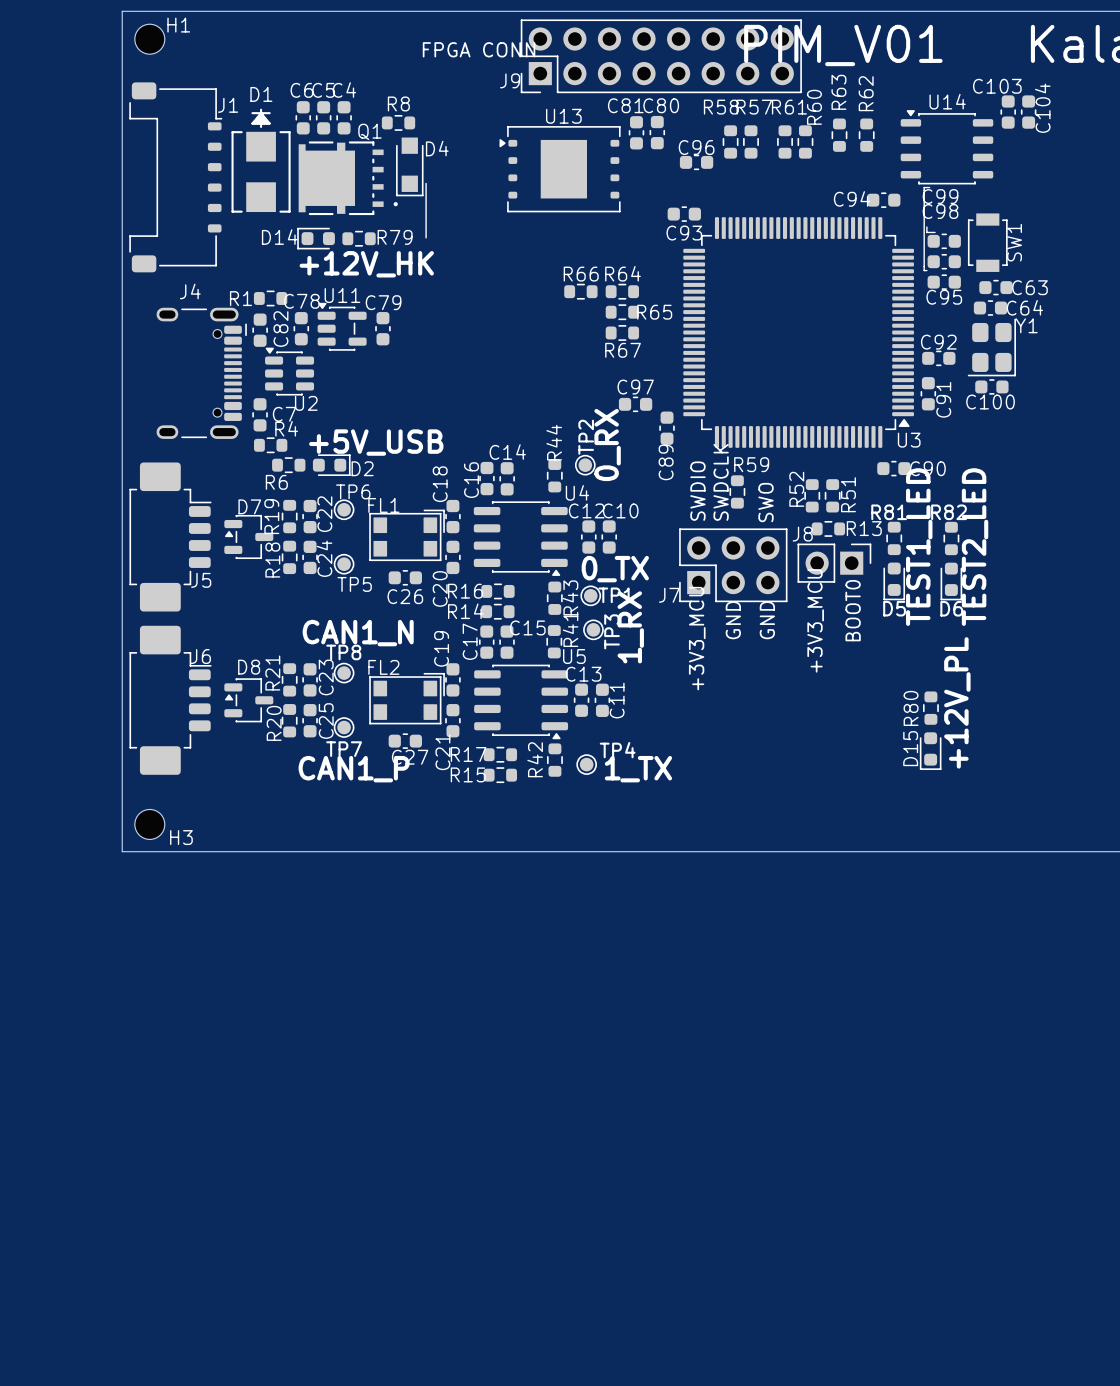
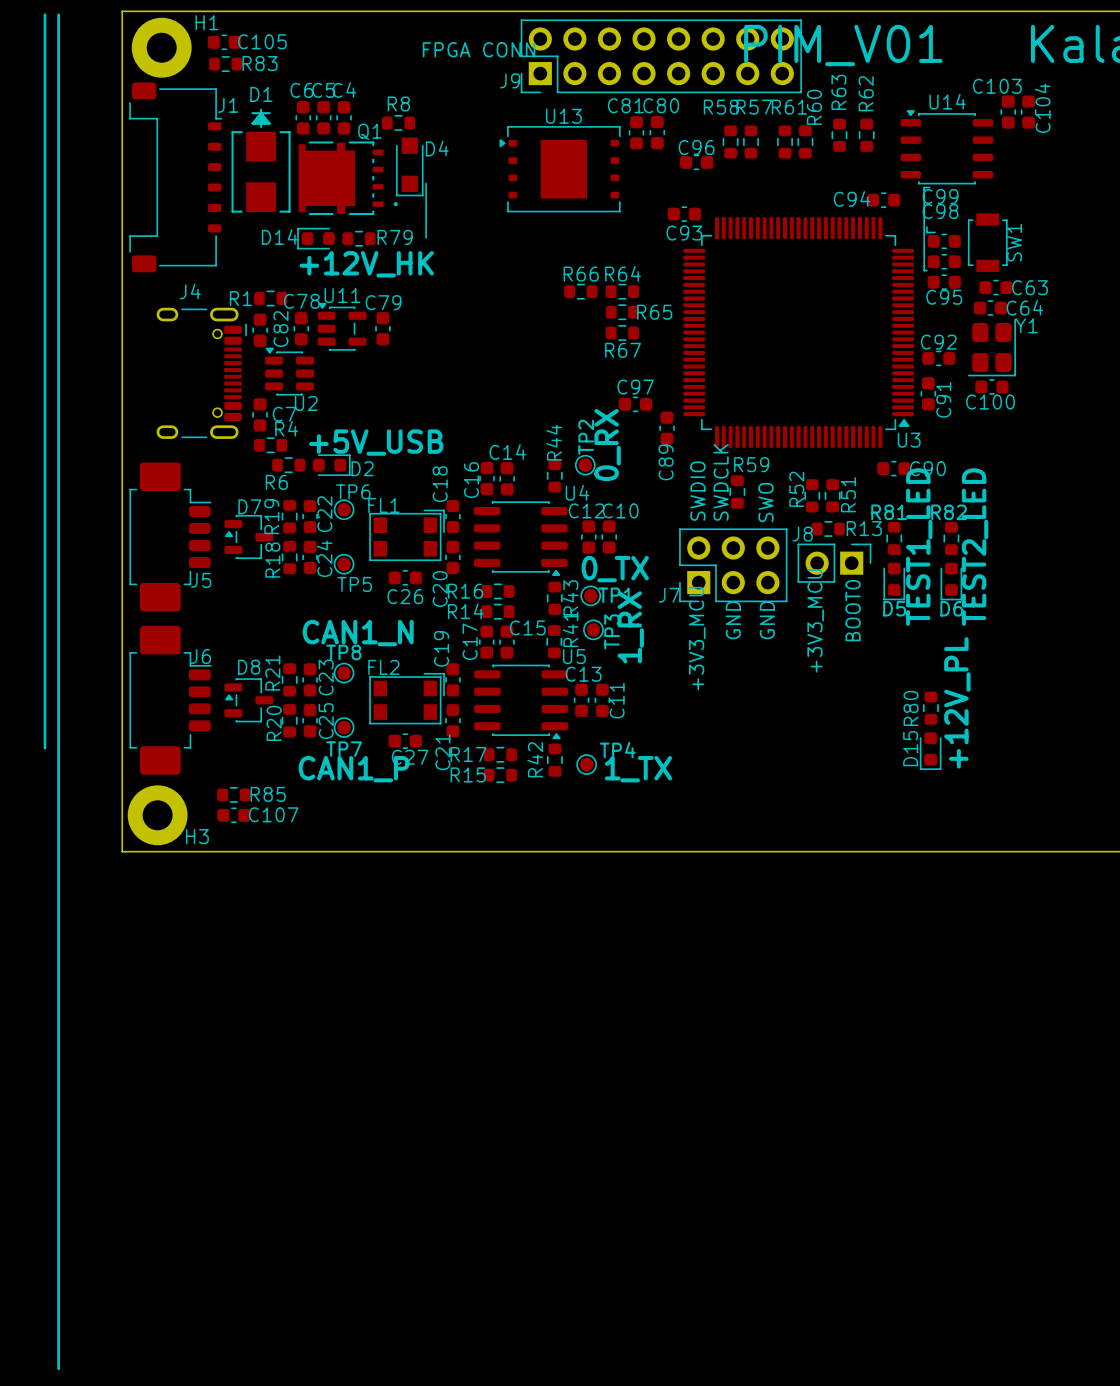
line: none -> (45, 14) (45, 748)
line: none -> (58, 14) (58, 1368)
H1 footprint: [134, 24, 165, 55] -> [131, 17, 192, 78]
C105: none -> (224, 42)
R83: none -> (225, 64)
R85: none -> (233, 794)
H3 footprint: [134, 809, 165, 840] -> [127, 785, 188, 846]
C107: none -> (233, 815)

